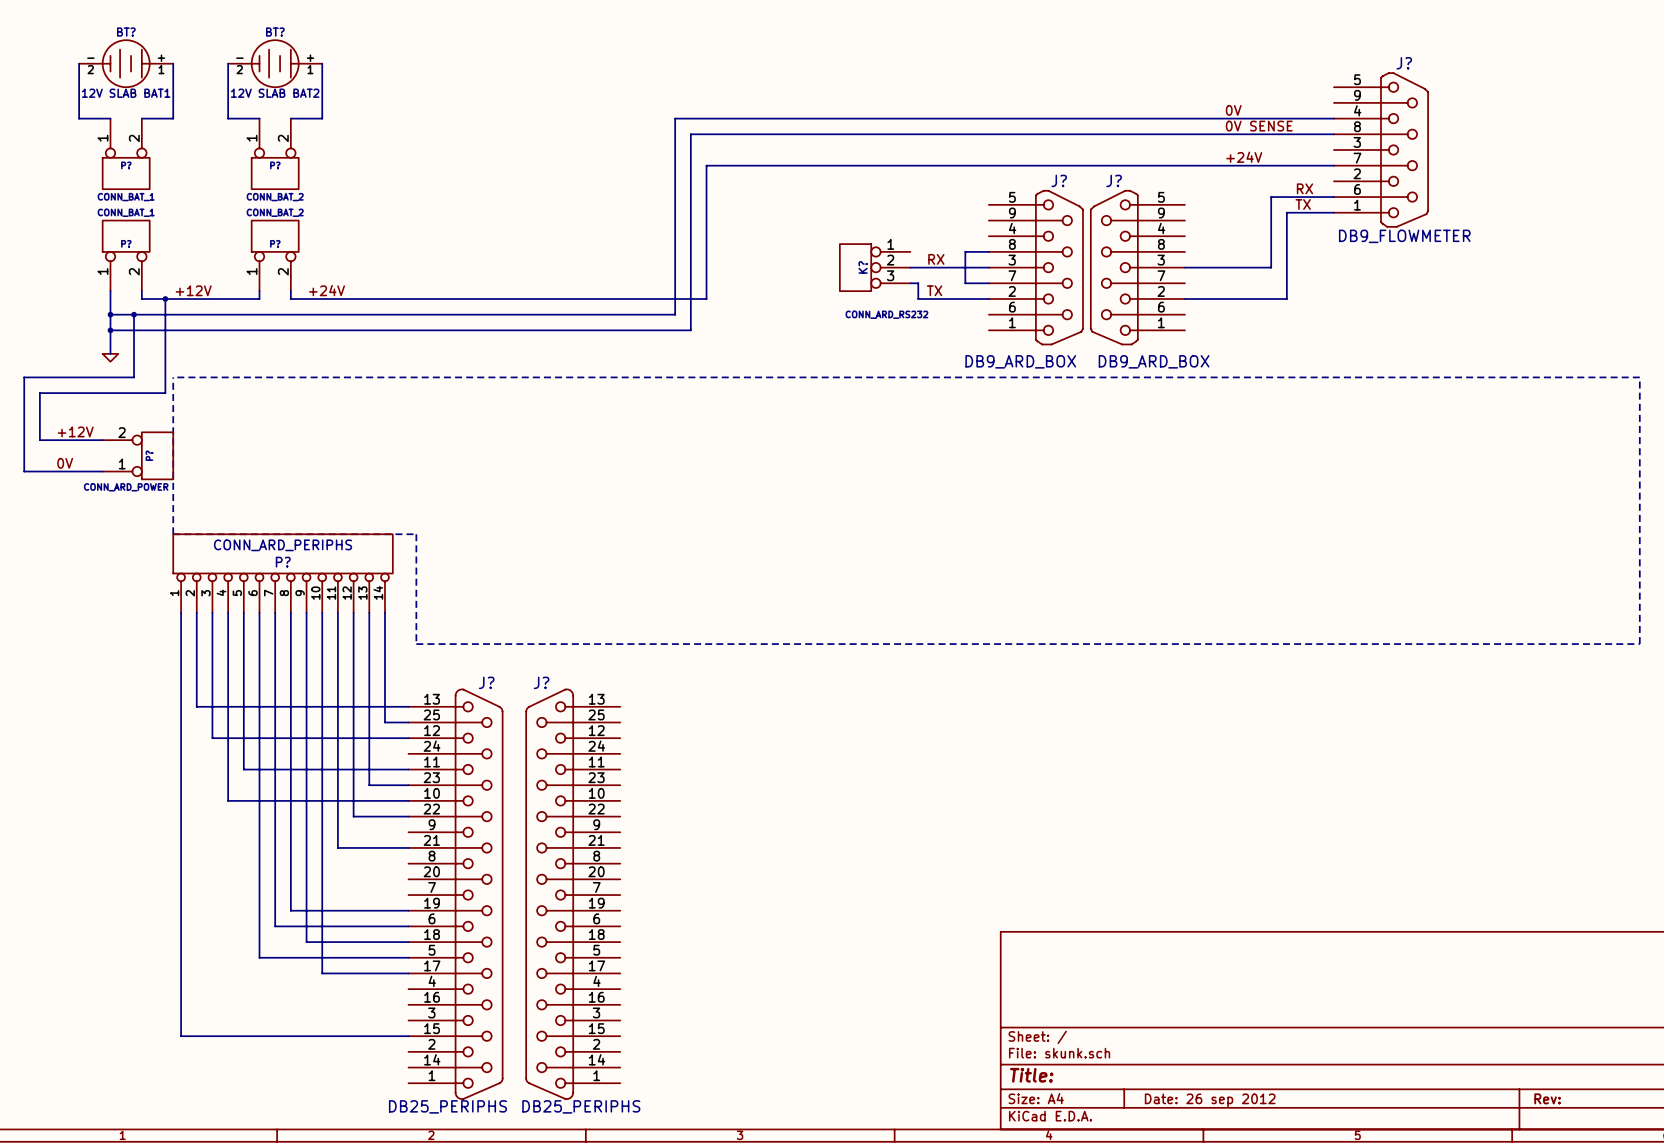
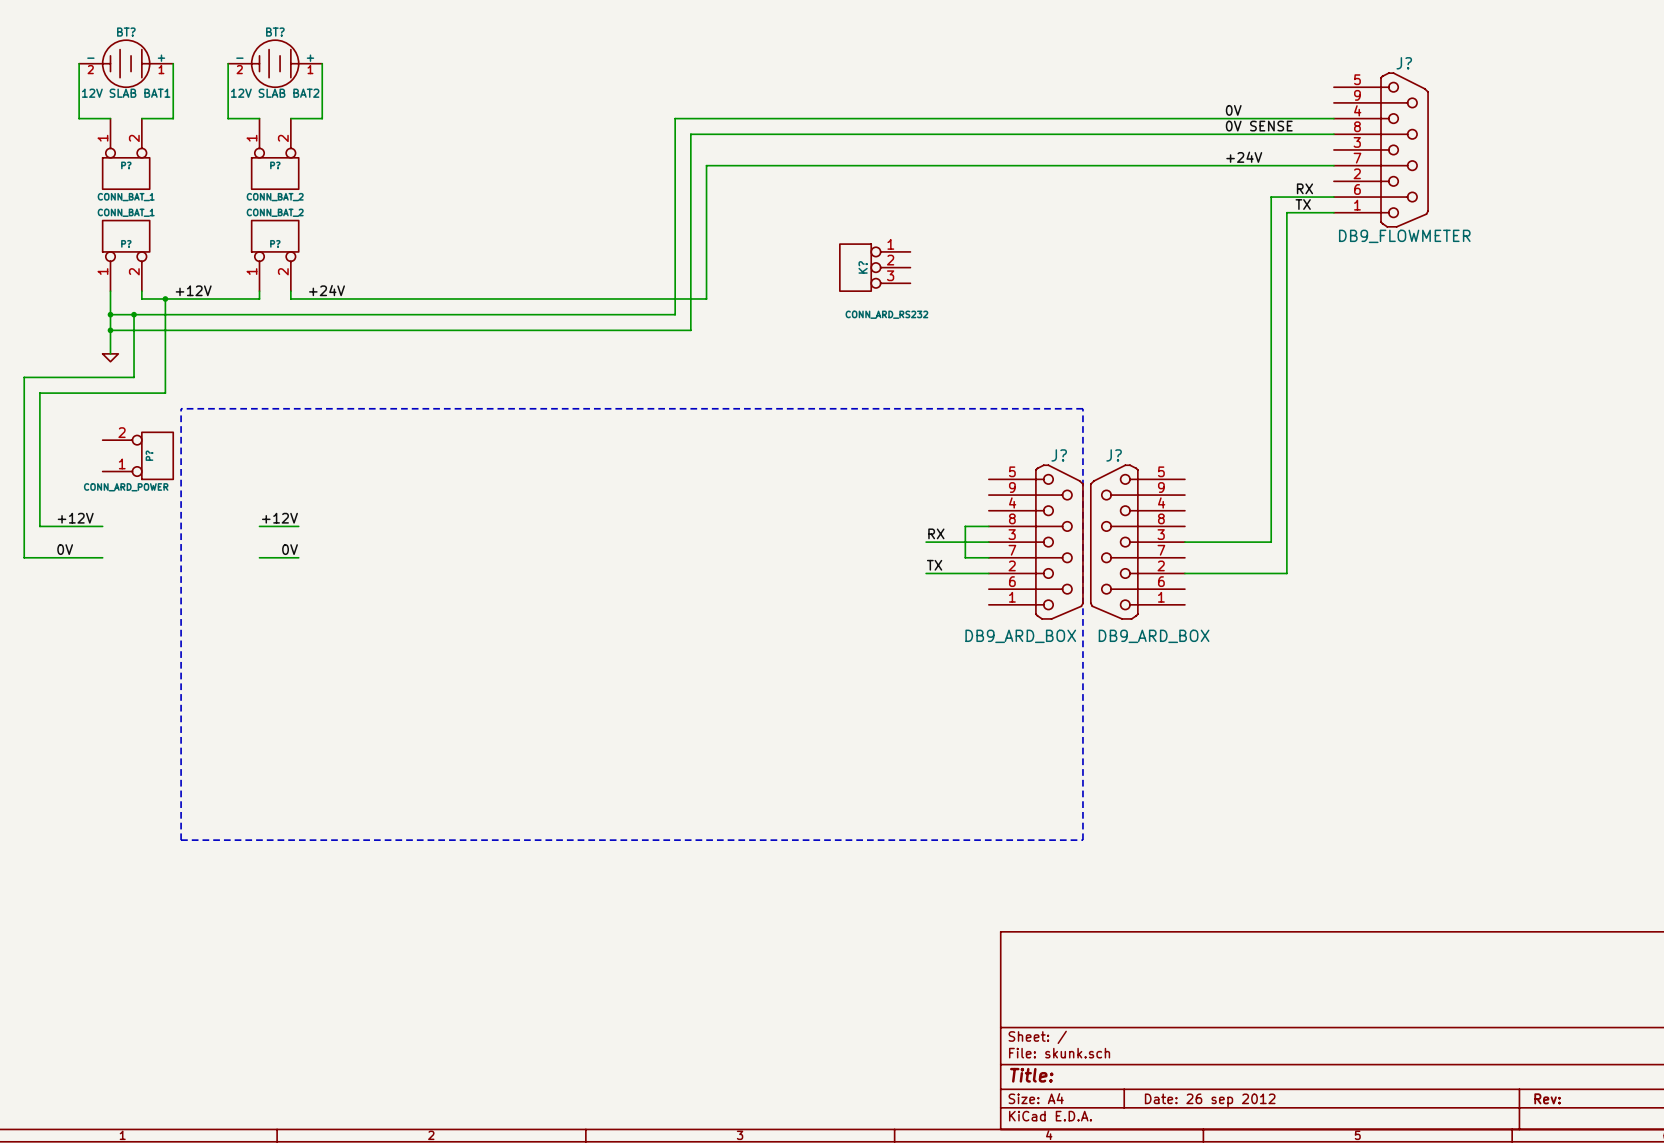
wire: (988, 251) (965, 251) (965, 283) (988, 283) -> none
label: RX (936, 259) -> none
wire: (910, 267) (988, 267) -> none
J?: DB9_ARD_BOX (1036, 267) -> none
J?: DB9_ARD_BOX (1137, 267) -> none
wire: (1184, 267) (1271, 267) -> (1184, 542) (1271, 542) (1271, 267)
wire: (910, 283) (918, 283) (918, 298) (988, 298) -> none
label: TX (934, 290) -> none
wire: (1184, 298) (1286, 298) -> (1184, 573) (1286, 573) (1286, 298)
line: (173, 377) (173, 534) (416, 534) (416, 644) (1639, 644) (1639, 377) (173, 377) -> none
line: none -> (181, 408) (181, 840) (1082, 840) (1082, 408) (181, 408)
label position: +12V (75, 431) -> +12V (75, 518)
wire: (39, 440) (102, 440) -> (39, 440) (39, 526) (102, 526)
label position: 0V (65, 463) -> 0V (65, 549)
wire: (24, 471) (102, 471) -> (24, 471) (24, 557) (102, 557)
label: none -> +12V (279, 518)
wire: none -> (259, 526) (298, 526)
wire: none -> (988, 526) (965, 526) (965, 557) (988, 557)
label: none -> RX (936, 533)
wire: none -> (926, 542) (988, 542)
J?: none -> DB9_ARD_BOX (1036, 542)
J?: none -> DB9_ARD_BOX (1137, 542)
label: none -> 0V (290, 549)
wire: none -> (259, 557) (298, 557)
label: none -> TX (934, 565)
P?: CONN_ARD_PERIPHS (283, 573) -> none
wire: none -> (926, 573) (988, 573)
wire: (181, 612) (181, 1036) (408, 1036) -> none
wire: (196, 612) (196, 706) (408, 706) -> none
wire: (212, 612) (212, 738) (408, 738) -> none
wire: (228, 612) (228, 800) (408, 800) -> none
wire: (243, 612) (243, 769) (408, 769) -> none
wire: (259, 612) (259, 957) (408, 957) -> none
wire: (275, 612) (275, 926) (408, 926) -> none
wire: (290, 612) (290, 910) (408, 910) -> none
wire: (306, 612) (306, 942) (408, 942) -> none
wire: (322, 612) (322, 973) (408, 973) -> none
wire: (337, 612) (337, 847) (408, 847) -> none
wire: (353, 612) (353, 816) (408, 816) -> none
wire: (369, 612) (369, 785) (408, 785) -> none
wire: (384, 612) (384, 722) (408, 722) -> none
J?: DB25_PERIPHS (455, 894) -> none
J?: DB25_PERIPHS (572, 894) -> none

